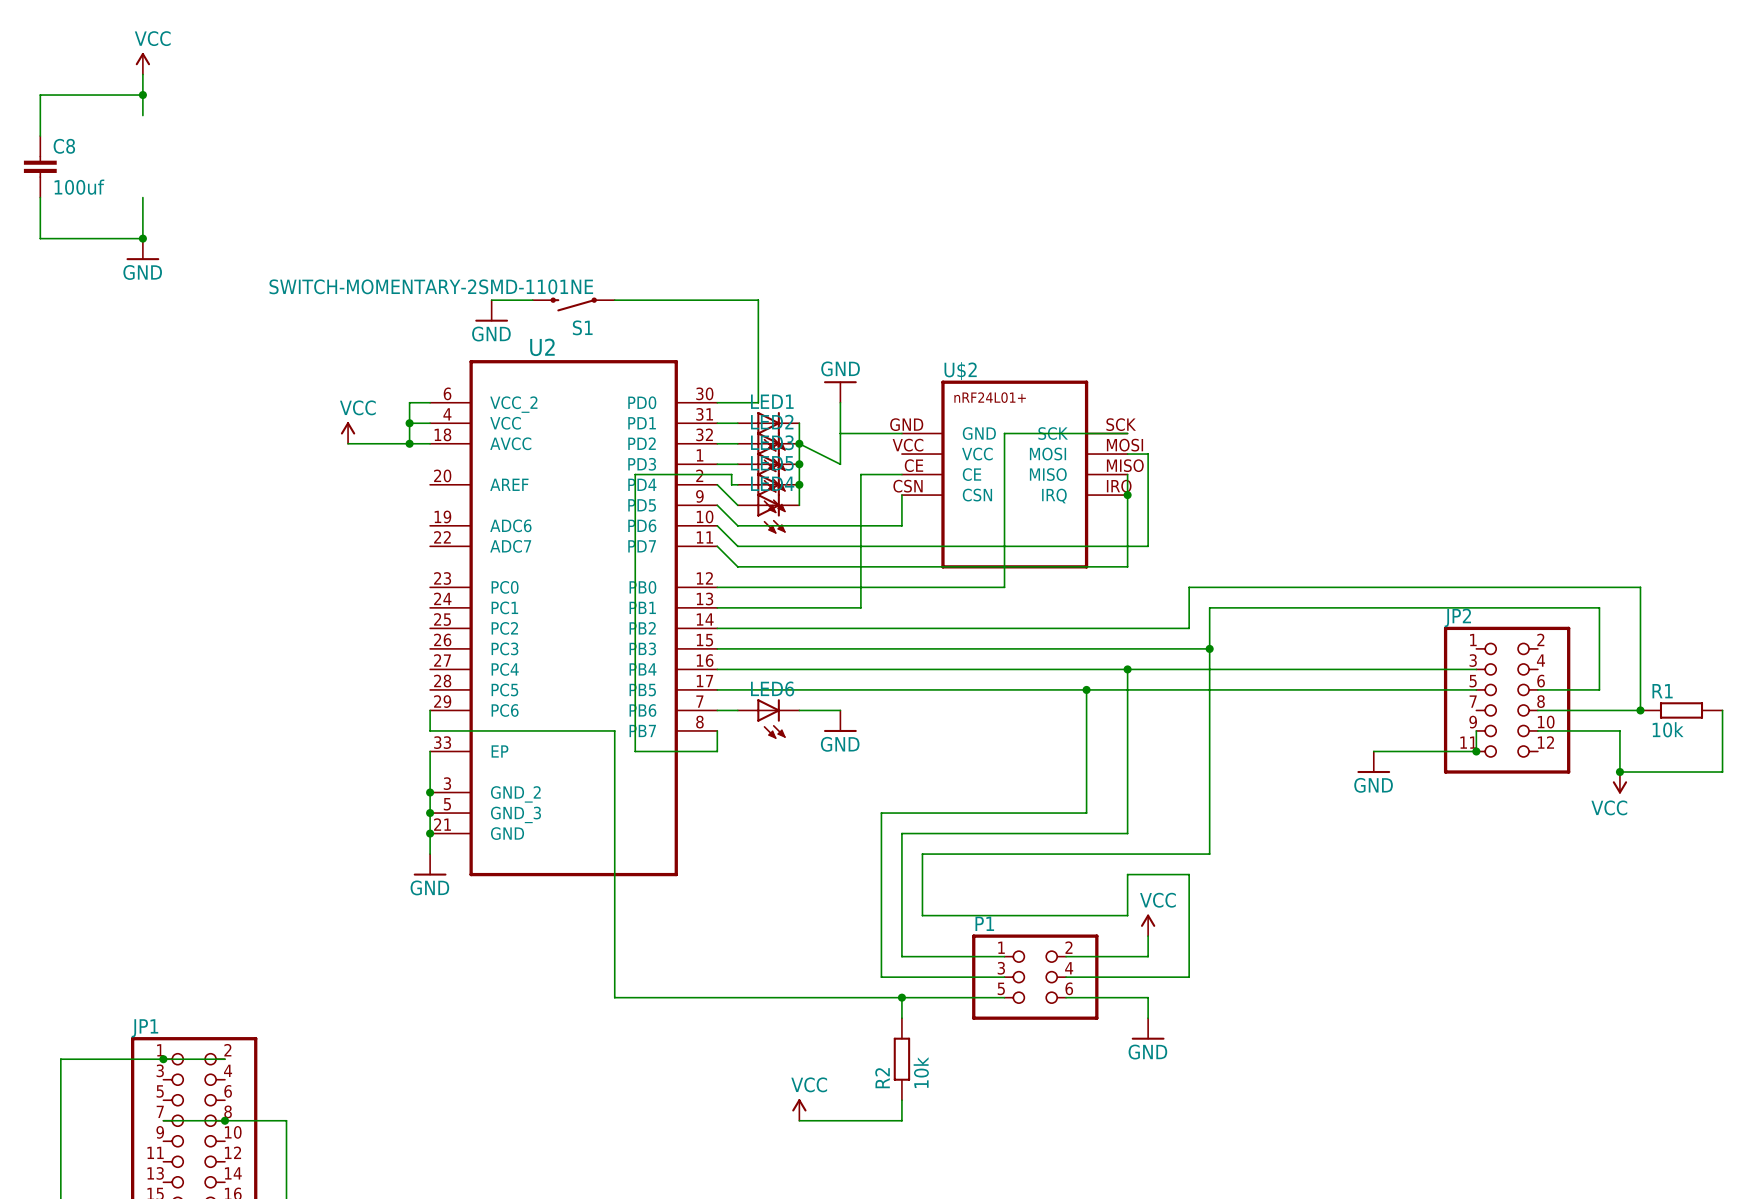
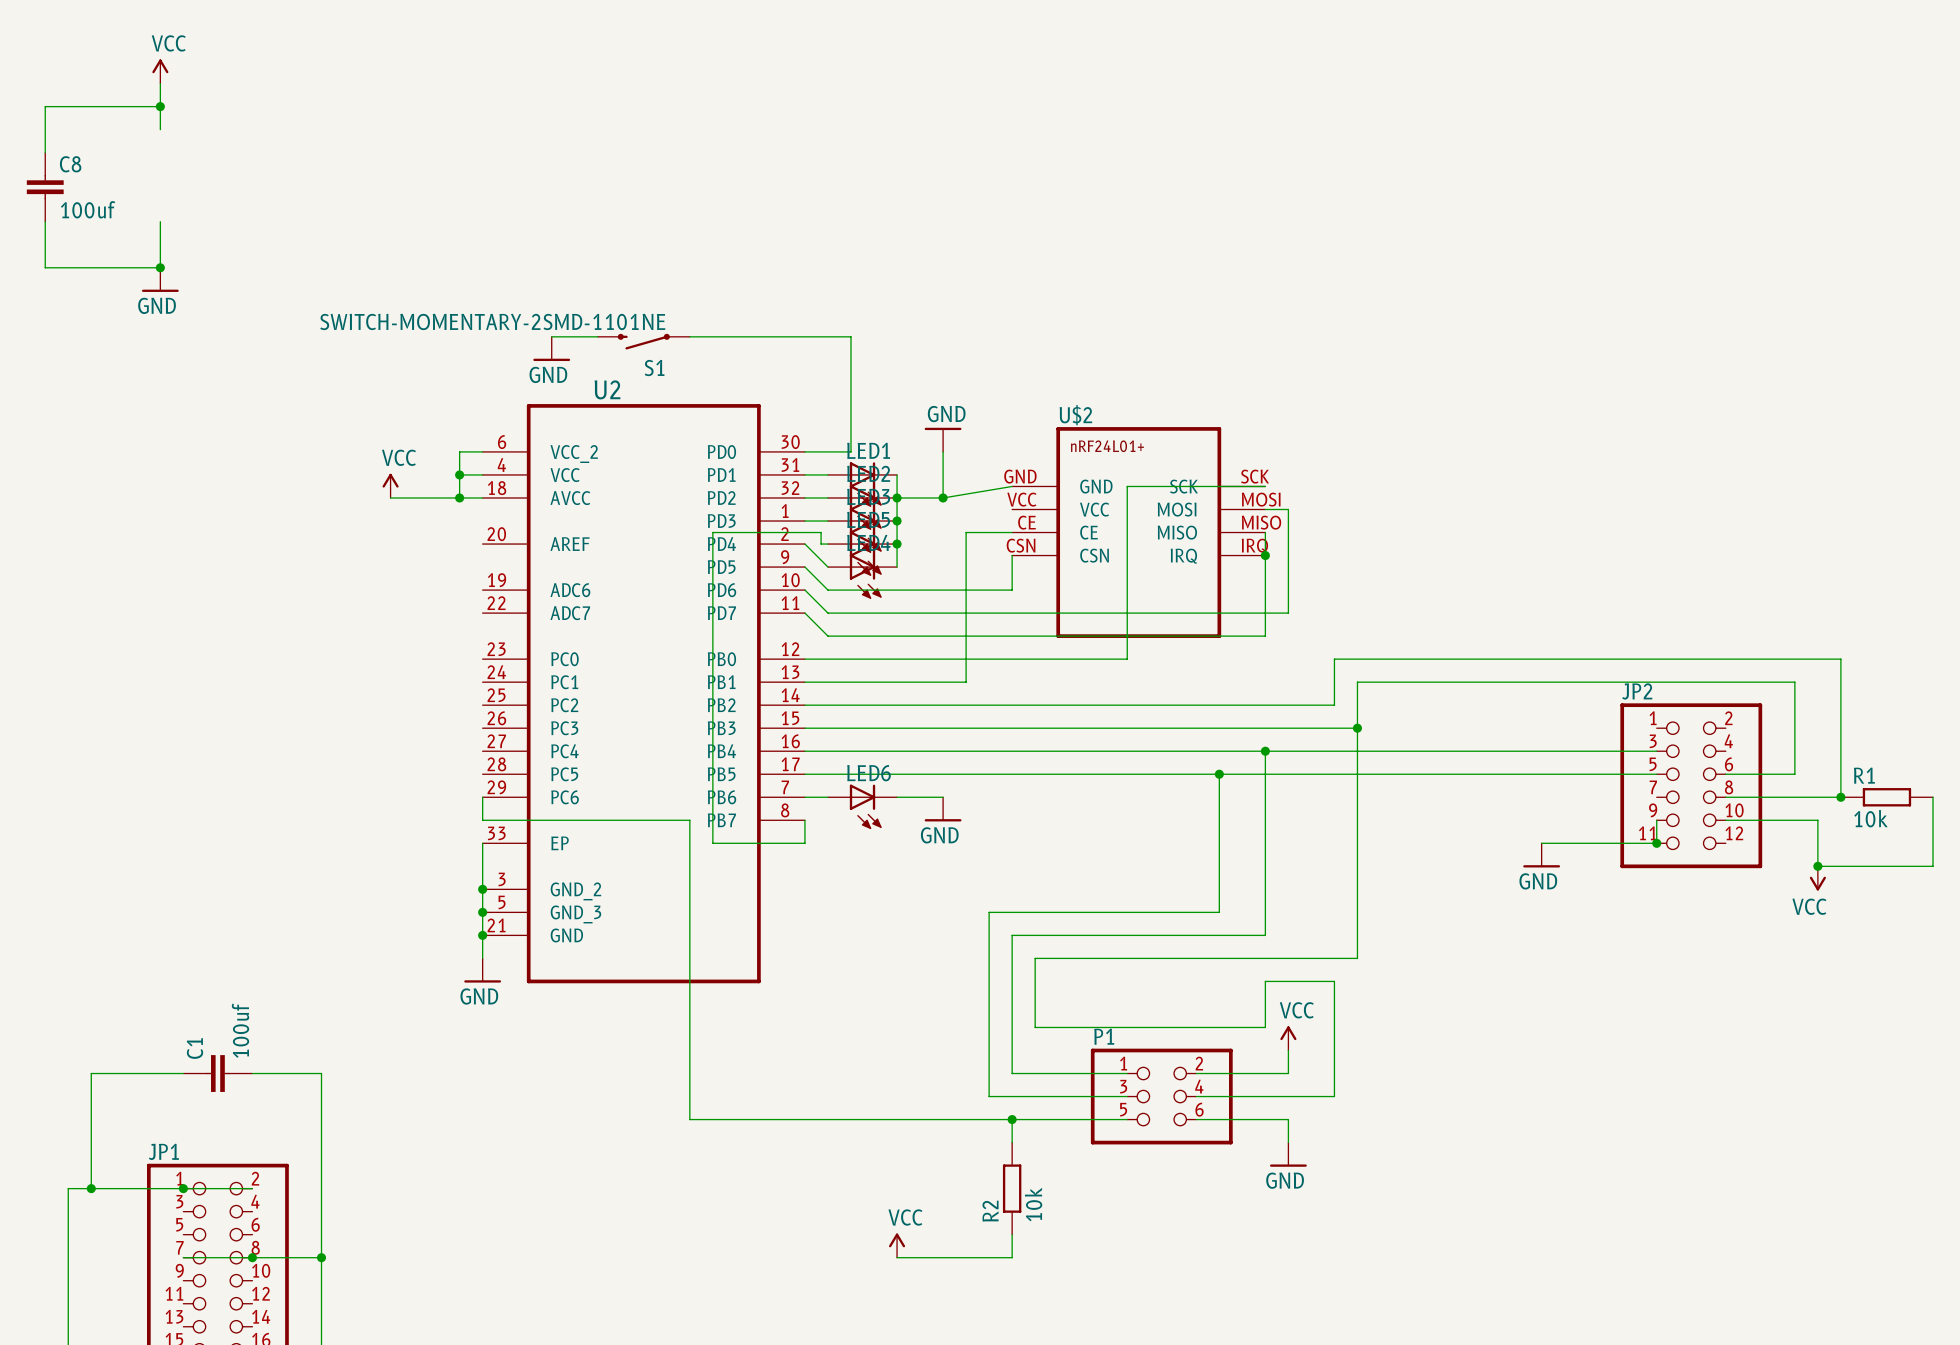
wire: (840, 433) (901, 433) -> (897, 497) (943, 497) (1012, 486)
wire: (799, 443) (840, 464) (840, 443) -> none
junction: none -> (943, 497)
wire: none -> (183, 1073) (91, 1073) (91, 1188)
C1: none -> 100uf (217, 1073)
wire: none -> (252, 1073) (321, 1073) (321, 1257)
junction: none -> (91, 1188)
junction: none -> (321, 1257)

